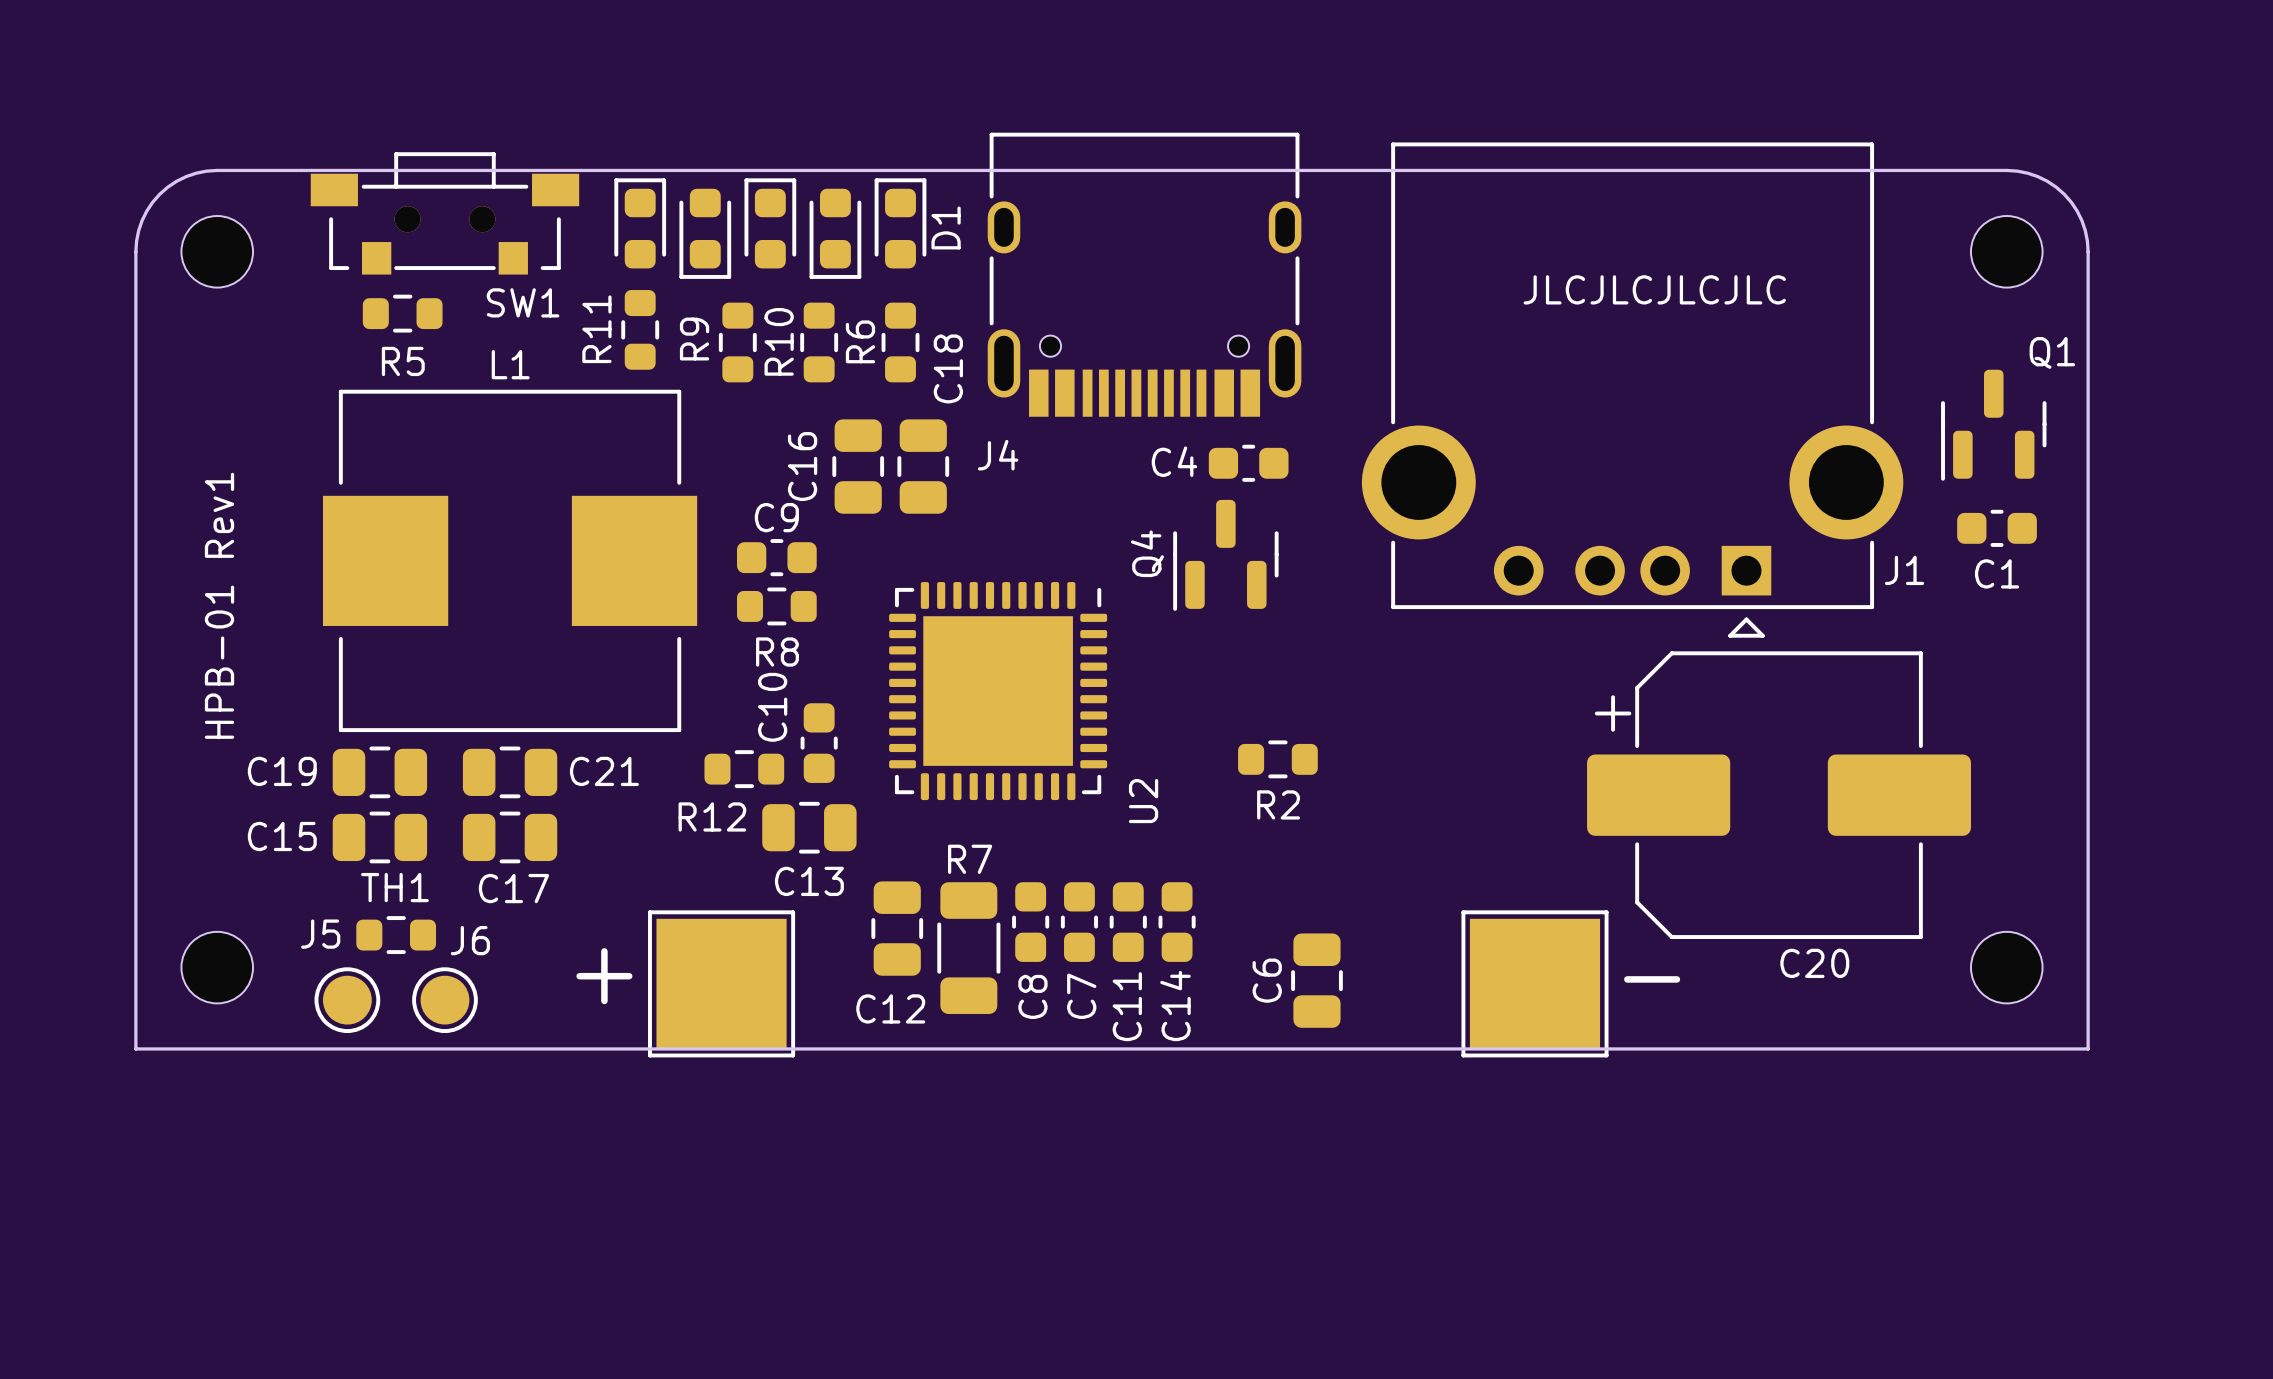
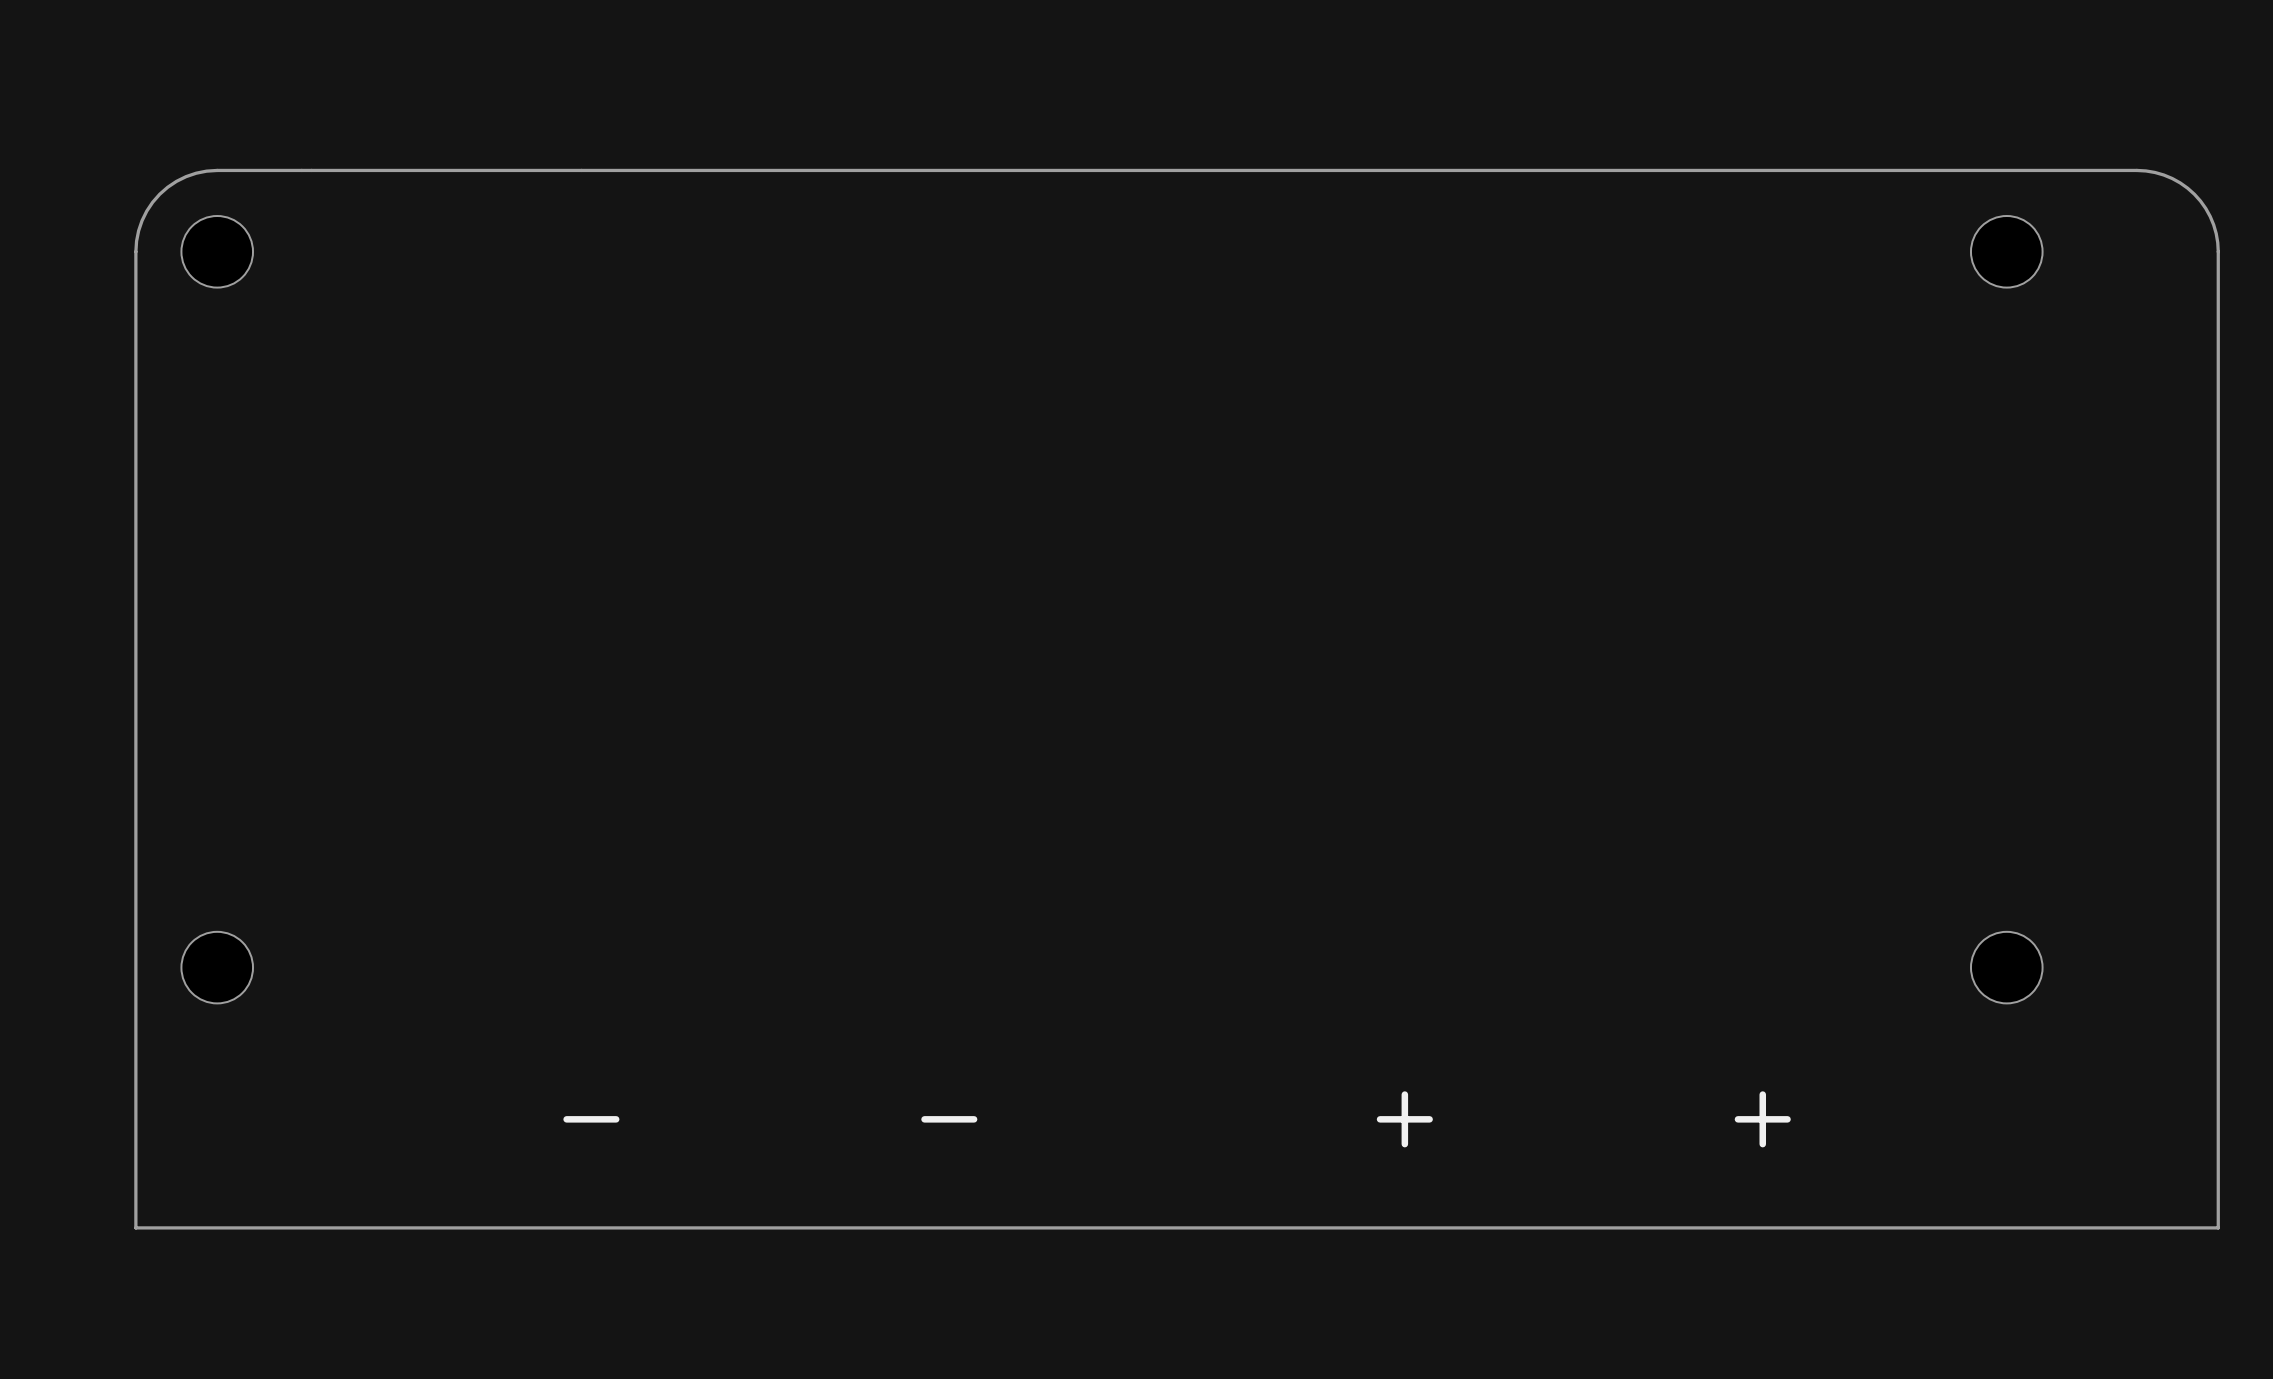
board edge: (2006, 170) (2037, 176) (2056, 187) (2077, 211) (2087, 241) (2088, 1048) (135, 1048) -> (2006, 170) (2136, 170) (2163, 175) (2180, 182) (2194, 194) (2210, 216) (2216, 233) (2218, 251) (2218, 1227) (135, 1227) (135, 1048)
SW1: (444, 213) -> none
part: (640, 223) -> none
part: (770, 223) -> none
D1: (900, 223) -> none
part: (705, 233) -> none
part: (835, 233) -> none
J4: (1144, 274) -> none
text: JLCJLCJLCJLC (1654, 289) -> none
R5: (402, 313) -> none
R11: (640, 329) -> none
R9: (737, 342) -> none
R10: (819, 342) -> none
R6: (900, 342) -> none
J1: (1632, 390) -> none
Q1: (1993, 425) -> none
C4: (1248, 463) -> none
C16: (858, 466) -> none
C18: (923, 466) -> none
C1: (1997, 528) -> none
Q4: (1225, 555) -> none
C9: (776, 557) -> none
L1: (510, 560) -> none
text: HPB-01 Rev1 (219, 605) -> none
R8: (776, 606) -> none
U2: (998, 691) -> none
C10: (819, 743) -> none
R2: (1277, 759) -> none
R12: (744, 769) -> none
C19: (379, 772) -> none
C21: (510, 772) -> none
C20: (1779, 795) -> none
C13: (809, 827) -> none
C15: (379, 837) -> none
C17: (510, 837) -> none
C8: (1030, 922) -> none
C7: (1079, 922) -> none
C11: (1128, 922) -> none
C14: (1177, 922) -> none
C12: (897, 928) -> none
TH1: (396, 935) -> none
R7: (968, 948) -> none
text: + (604, 976) -> none
text: - (1652, 979) -> none
C6: (1316, 980) -> none
part: (721, 983) -> none
part: (1534, 983) -> none
J5: (347, 1000) -> none
J6: (444, 1000) -> none
text: none -> - (591, 1119)
text: none -> - (949, 1119)
text: none -> + (1404, 1119)
text: none -> + (1762, 1119)

